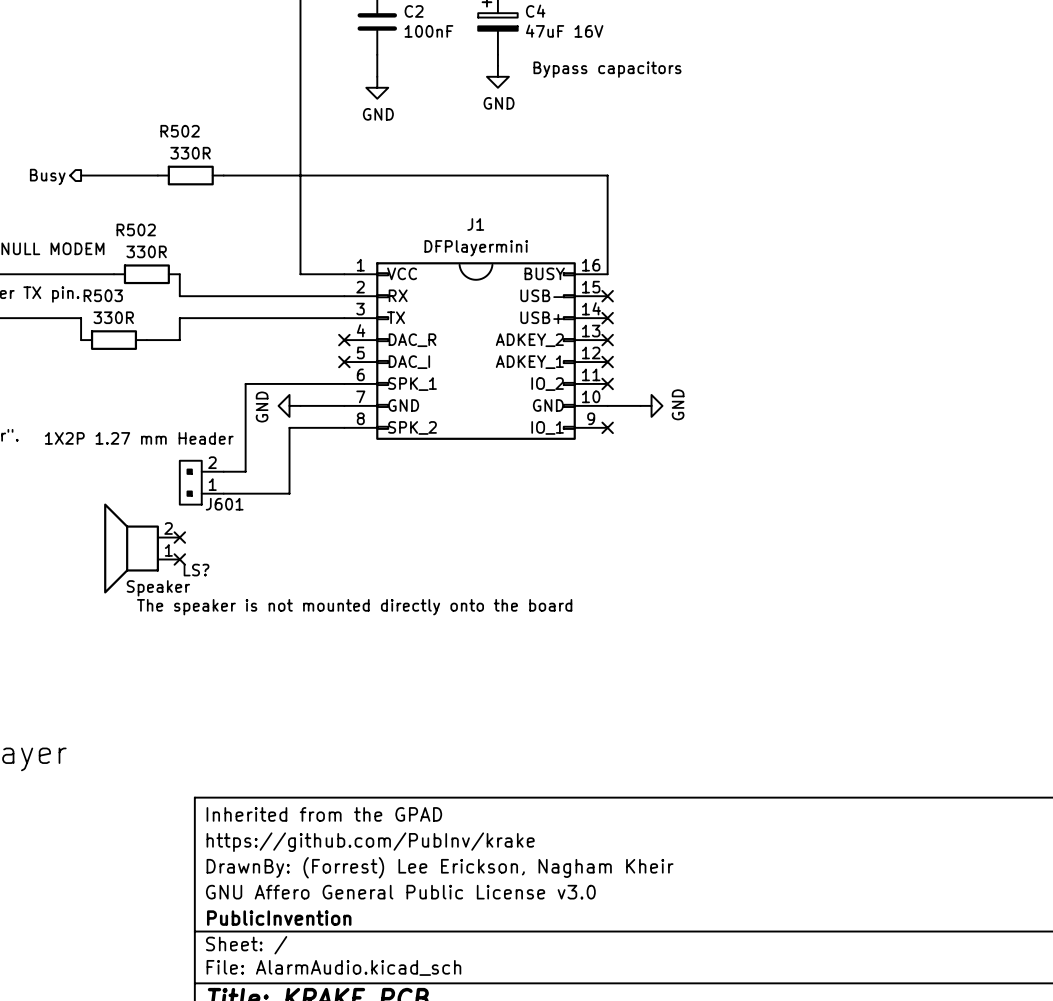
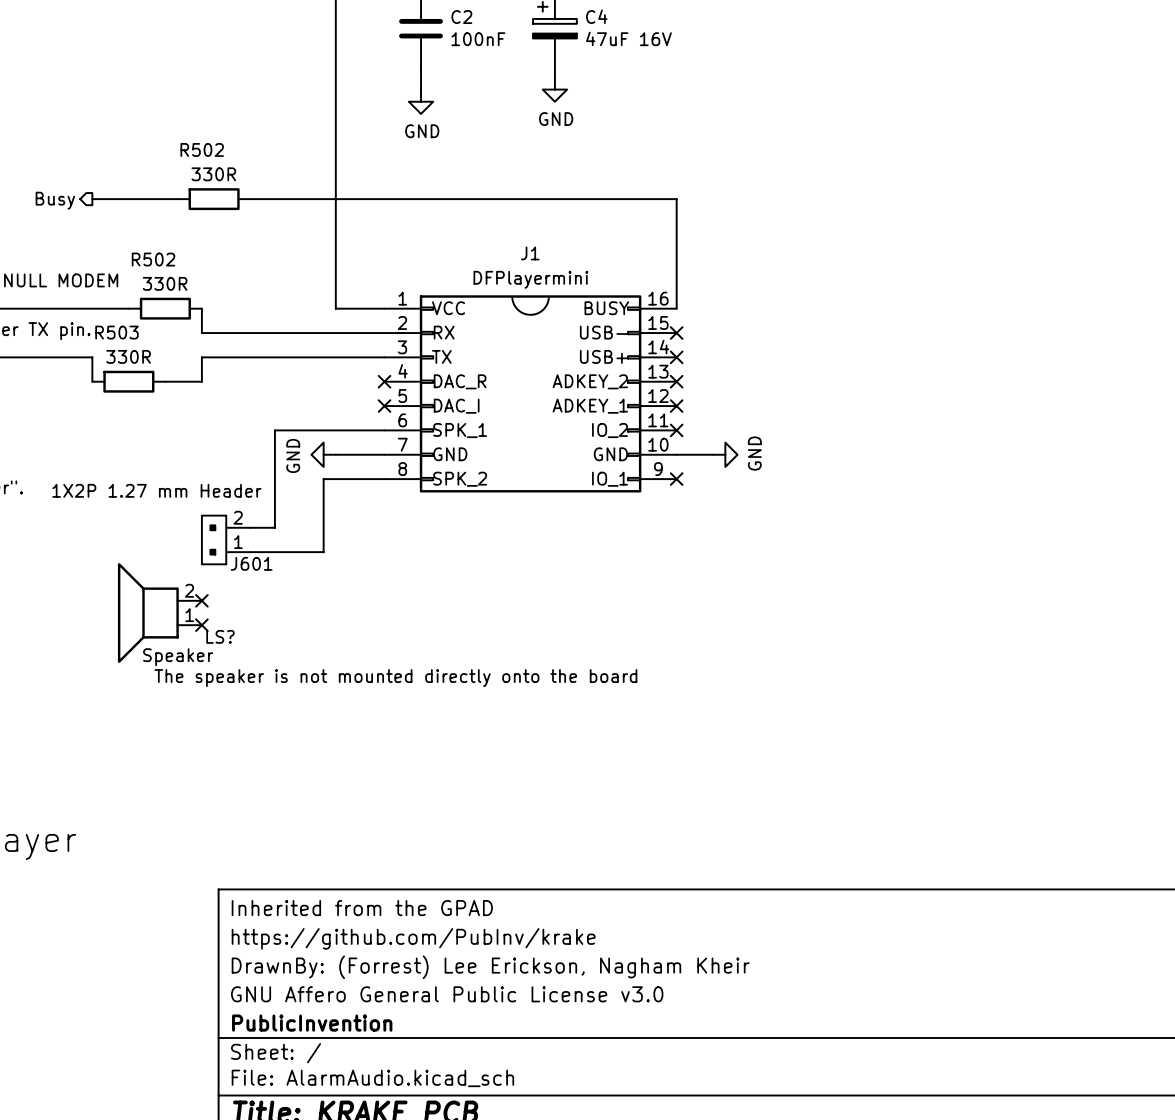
text: Bypass capacitors (607, 69) -> none

